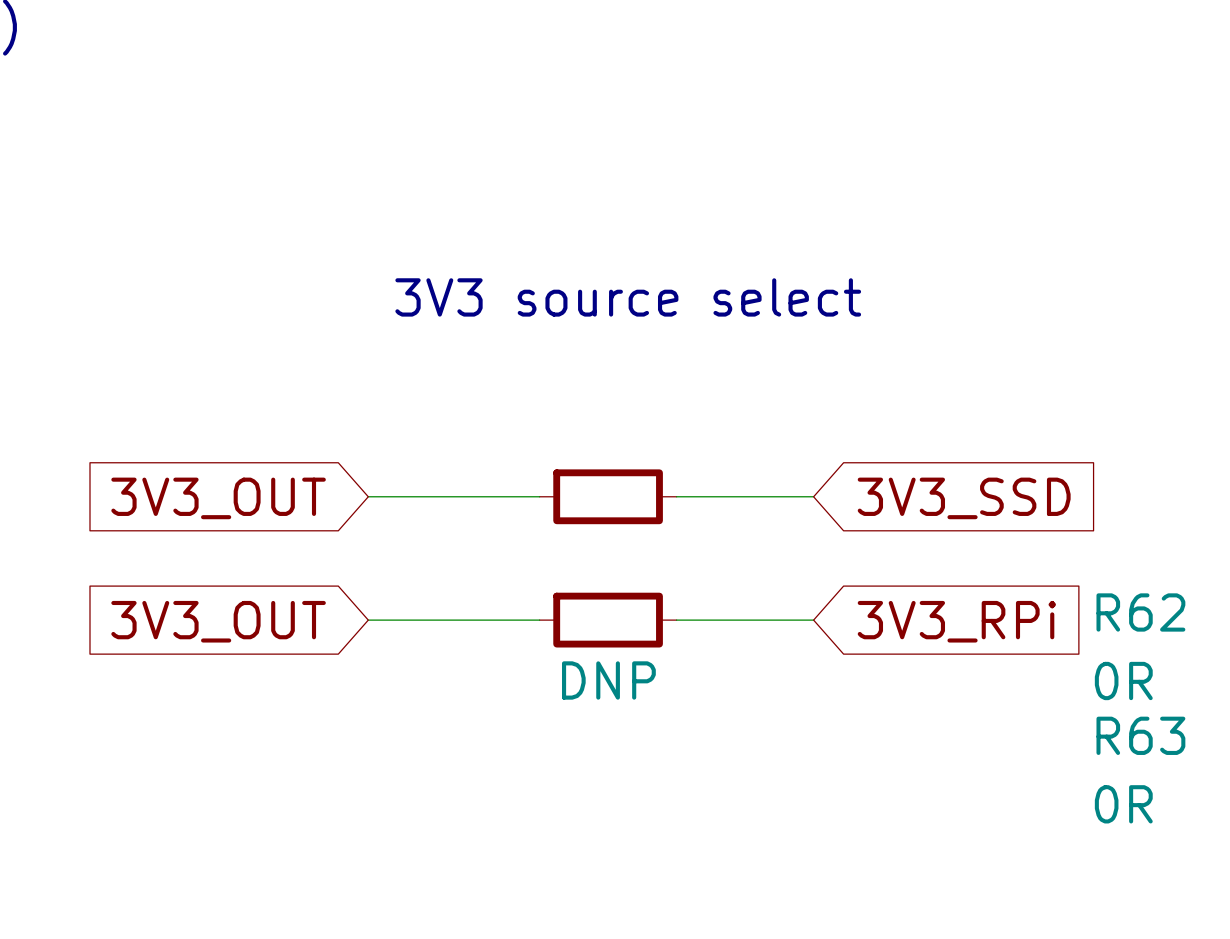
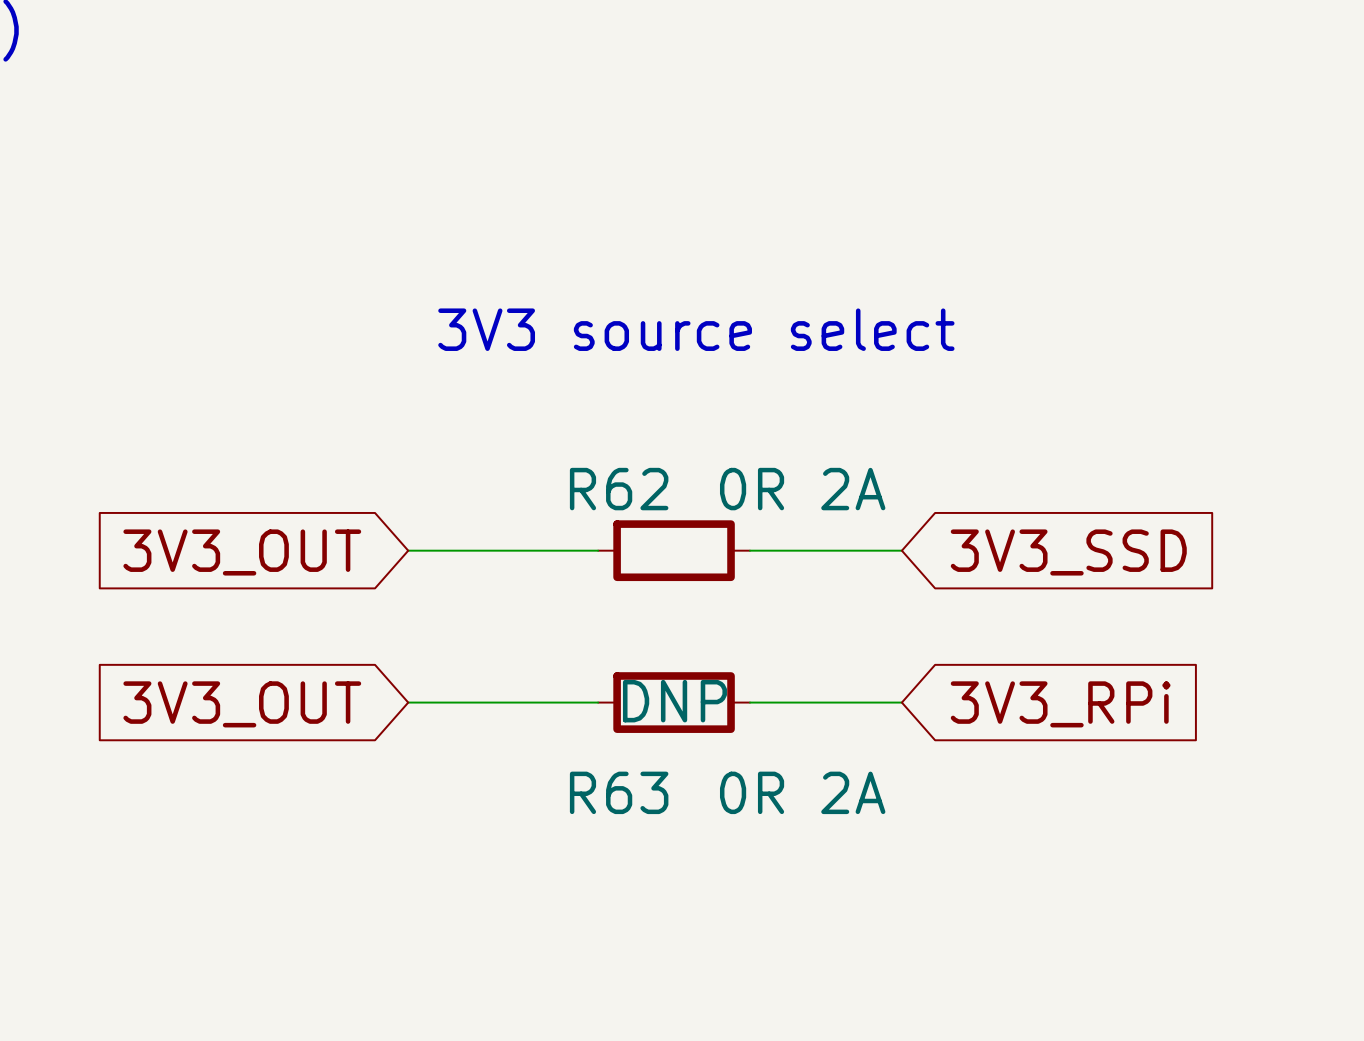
R62 name position: R62 (1140, 612) -> R62 (619, 489)
wire: (368, 620) (539, 620) -> (408, 702) (598, 702)
R63 position: (608, 620) -> (674, 702)
wire: (676, 620) (813, 620) -> (750, 702) (901, 702)
global label position: 3V3_OUT (218, 621) -> 3V3_OUT (242, 704)
global label position: 3V3_RPi (956, 621) -> 3V3_RPi (1060, 704)
R63 text position: DNP (608, 680) -> DNP (674, 701)
R62 text: 0R (1123, 681) -> 0R 2A (802, 489)
R63 name position: R63 (1140, 735) -> R63 (619, 792)
R63 text: 0R (1123, 804) -> 0R 2A (802, 792)

